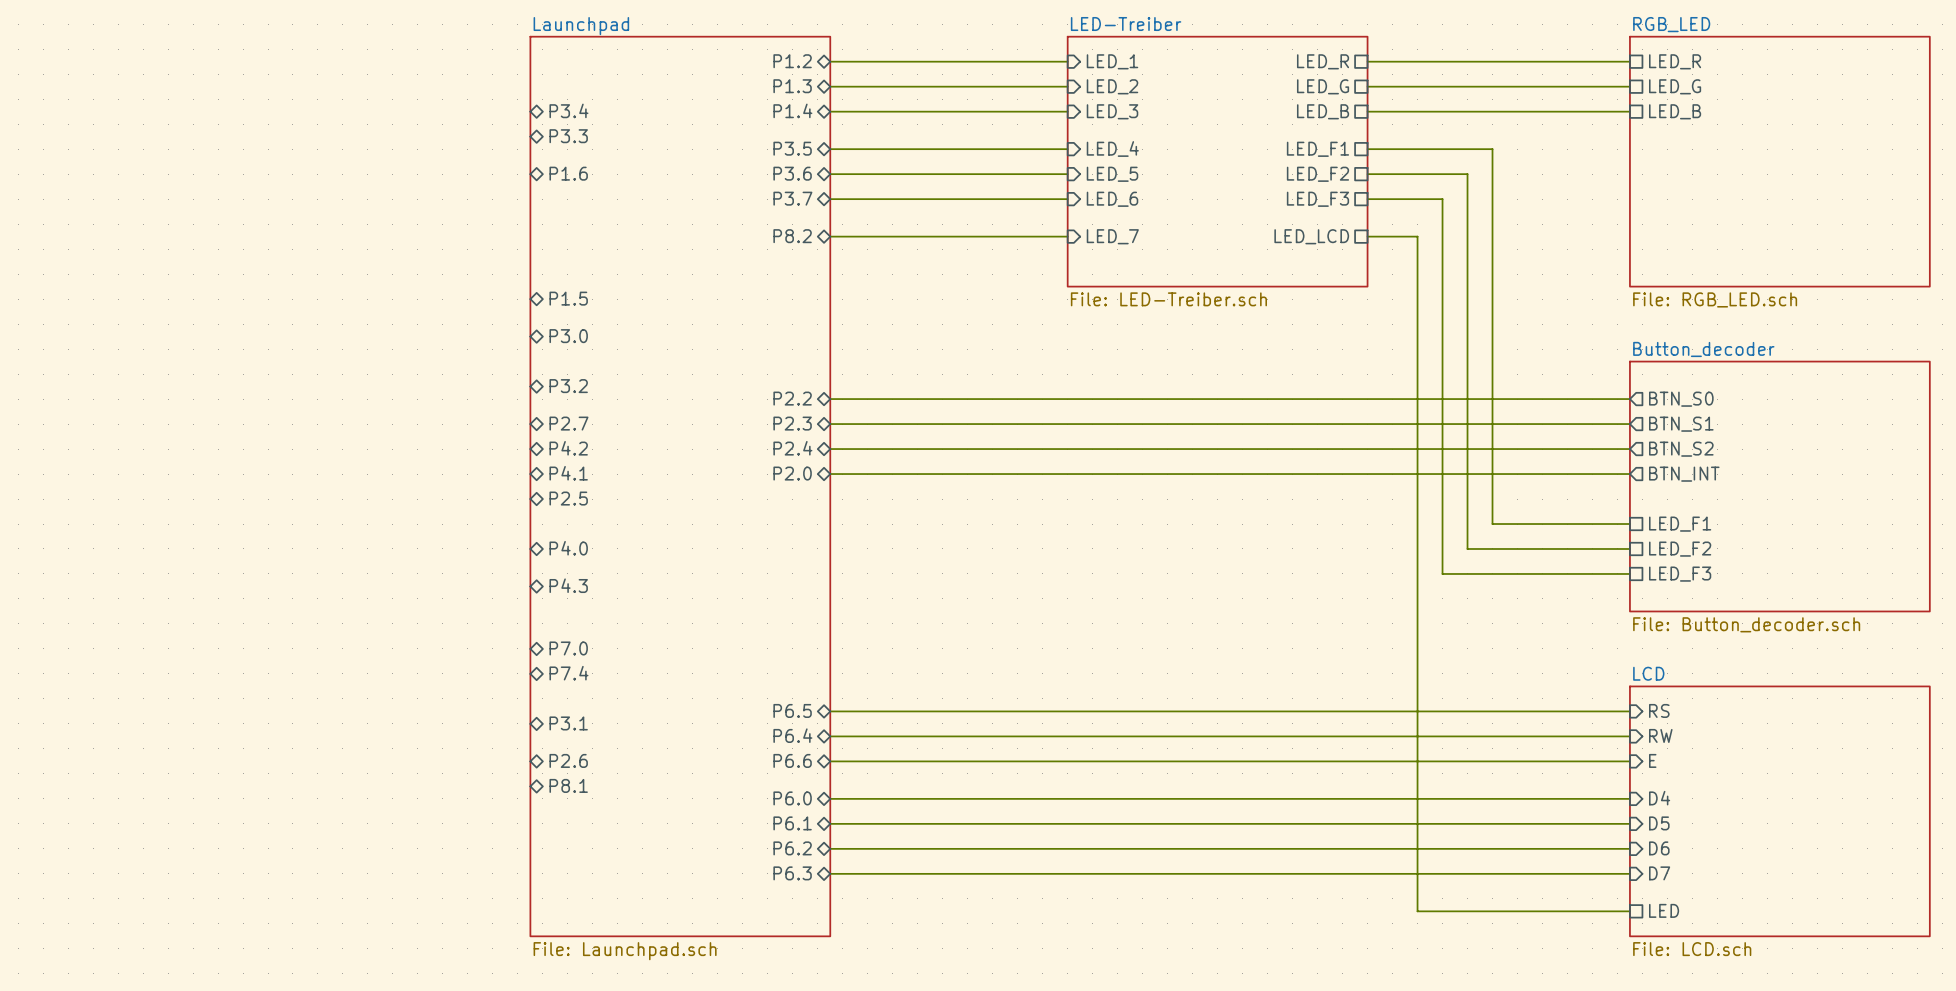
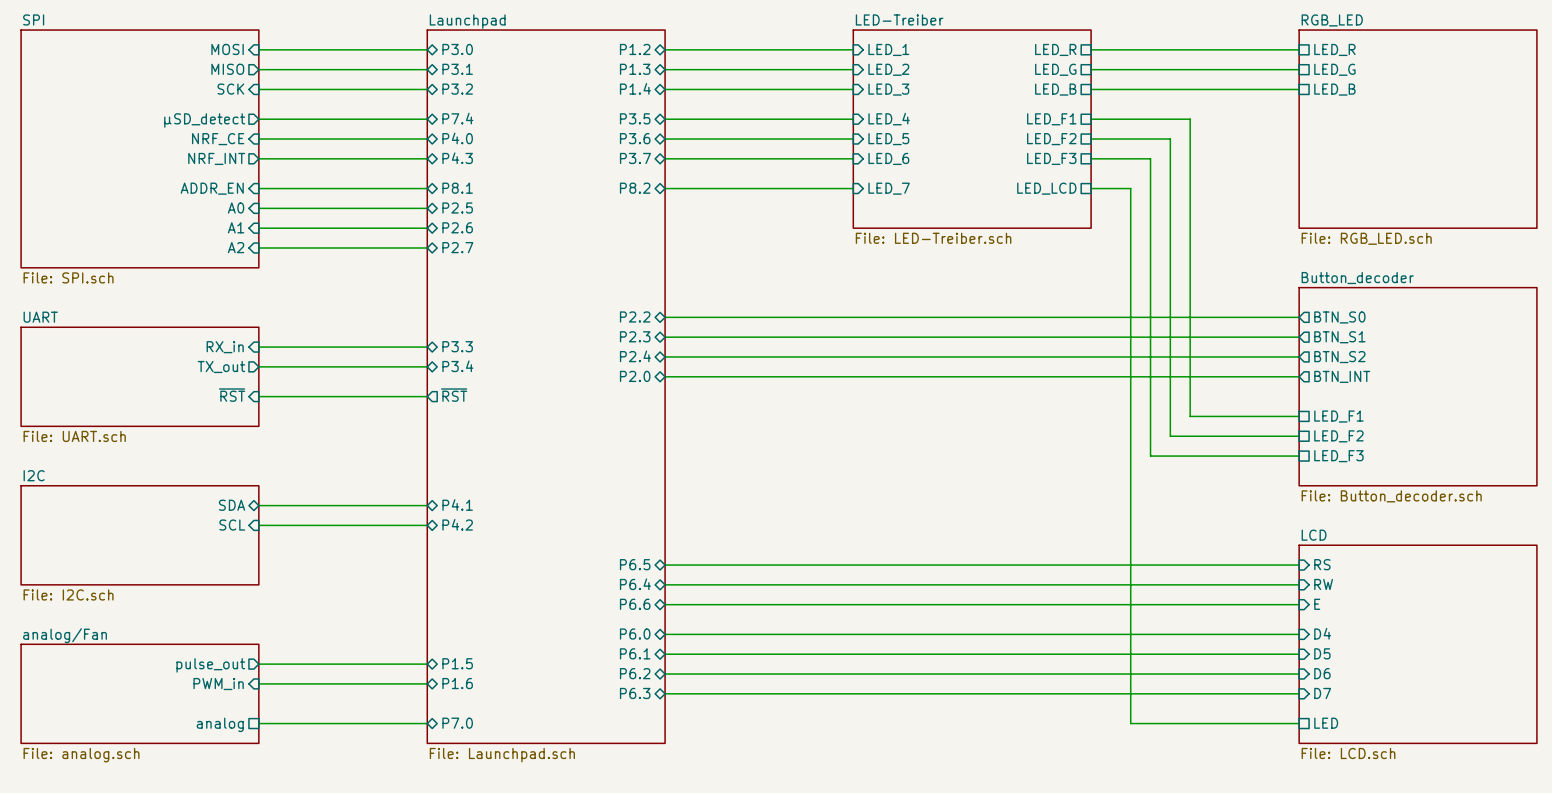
sheet pin: none -> MOSI (227, 49)
wire: none -> (258, 49) (427, 49)
sheet pin: none -> P3.0 (457, 49)
sheet pin: none -> MISO (227, 69)
wire: none -> (258, 69) (427, 69)
sheet pin: none -> P3.1 (457, 69)
sheet pin: P3.4 (568, 110) -> P3.2 (457, 89)
sheet pin: none -> SCK (230, 89)
wire: none -> (258, 89) (427, 89)
sheet pin: P3.3 (568, 136) -> none
sheet pin: none -> P7.4 (457, 118)
wire: none -> (258, 119) (427, 119)
sheet pin: none -> µSD_detect (204, 120)
sheet pin: P1.6 (568, 173) -> P4.0 (457, 138)
sheet pin: none -> NRF_CE (218, 139)
wire: none -> (258, 139) (427, 139)
sheet SPI: none -> File: SPI.sch (139, 148)
sheet pin: none -> P4.3 (457, 158)
sheet pin: none -> NRF_INT (216, 158)
wire: none -> (258, 158) (427, 158)
sheet pin: none -> ADDR_EN (212, 188)
wire: none -> (258, 188) (427, 188)
sheet pin: none -> P8.1 (457, 188)
sheet pin: none -> A0 (236, 208)
wire: none -> (258, 208) (427, 208)
sheet pin: none -> P2.5 (457, 208)
sheet pin: none -> A1 (236, 227)
wire: none -> (258, 228) (427, 228)
sheet pin: none -> P2.6 (457, 227)
sheet pin: P1.5 (568, 298) -> none
sheet pin: none -> A2 (236, 247)
wire: none -> (258, 248) (427, 248)
sheet pin: P3.0 (568, 336) -> none
sheet pin: P3.2 (568, 386) -> none
sheet pin position: P2.7 (568, 423) -> P2.7 (457, 247)
sheet pin: none -> RX_in (225, 347)
wire: none -> (258, 347) (427, 347)
sheet pin: none -> P3.3 (457, 346)
sheet pin position: P4.2 (568, 448) -> P4.2 (457, 524)
sheet pin: none -> P3.4 (457, 366)
sheet pin: none -> TX_out (221, 366)
wire: none -> (258, 366) (427, 366)
sheet pin position: P4.1 (568, 473) -> P4.1 (457, 504)
sheet UART: none -> File: UART.sch (139, 376)
sheet pin: none -> ~{RST} (232, 395)
sheet pin shape: bidirectional (568, 498) -> output (454, 395)
sheet pin: P2.5 (568, 498) -> ~{RST} (454, 395)
wire: none -> (258, 396) (427, 396)
sheet pin: P4.0 (568, 548) -> none
sheet pin: P4.3 (568, 585) -> none
sheet pin: none -> SDA (232, 505)
wire: none -> (258, 505) (427, 505)
sheet pin: P7.0 (568, 648) -> none
sheet pin: none -> SCL (232, 525)
wire: none -> (258, 525) (427, 525)
sheet I2C: none -> File: I2C.sch (139, 535)
sheet pin: P7.4 (568, 673) -> none
sheet pin: P3.1 (568, 723) -> none
sheet pin: P2.6 (568, 760) -> none
sheet pin: P8.1 (568, 785) -> none
sheet pin: none -> P1.5 (457, 663)
wire: none -> (258, 664) (427, 664)
sheet pin: none -> pulse_out (210, 665)
sheet pin: none -> P1.6 (457, 683)
sheet pin: none -> PWM_in (218, 684)
wire: none -> (258, 683) (427, 683)
sheet analog/Fan: none -> File: analog.sch (139, 693)
sheet pin: none -> P7.0 (457, 723)
wire: none -> (258, 723) (427, 723)
sheet pin: none -> analog (220, 724)

